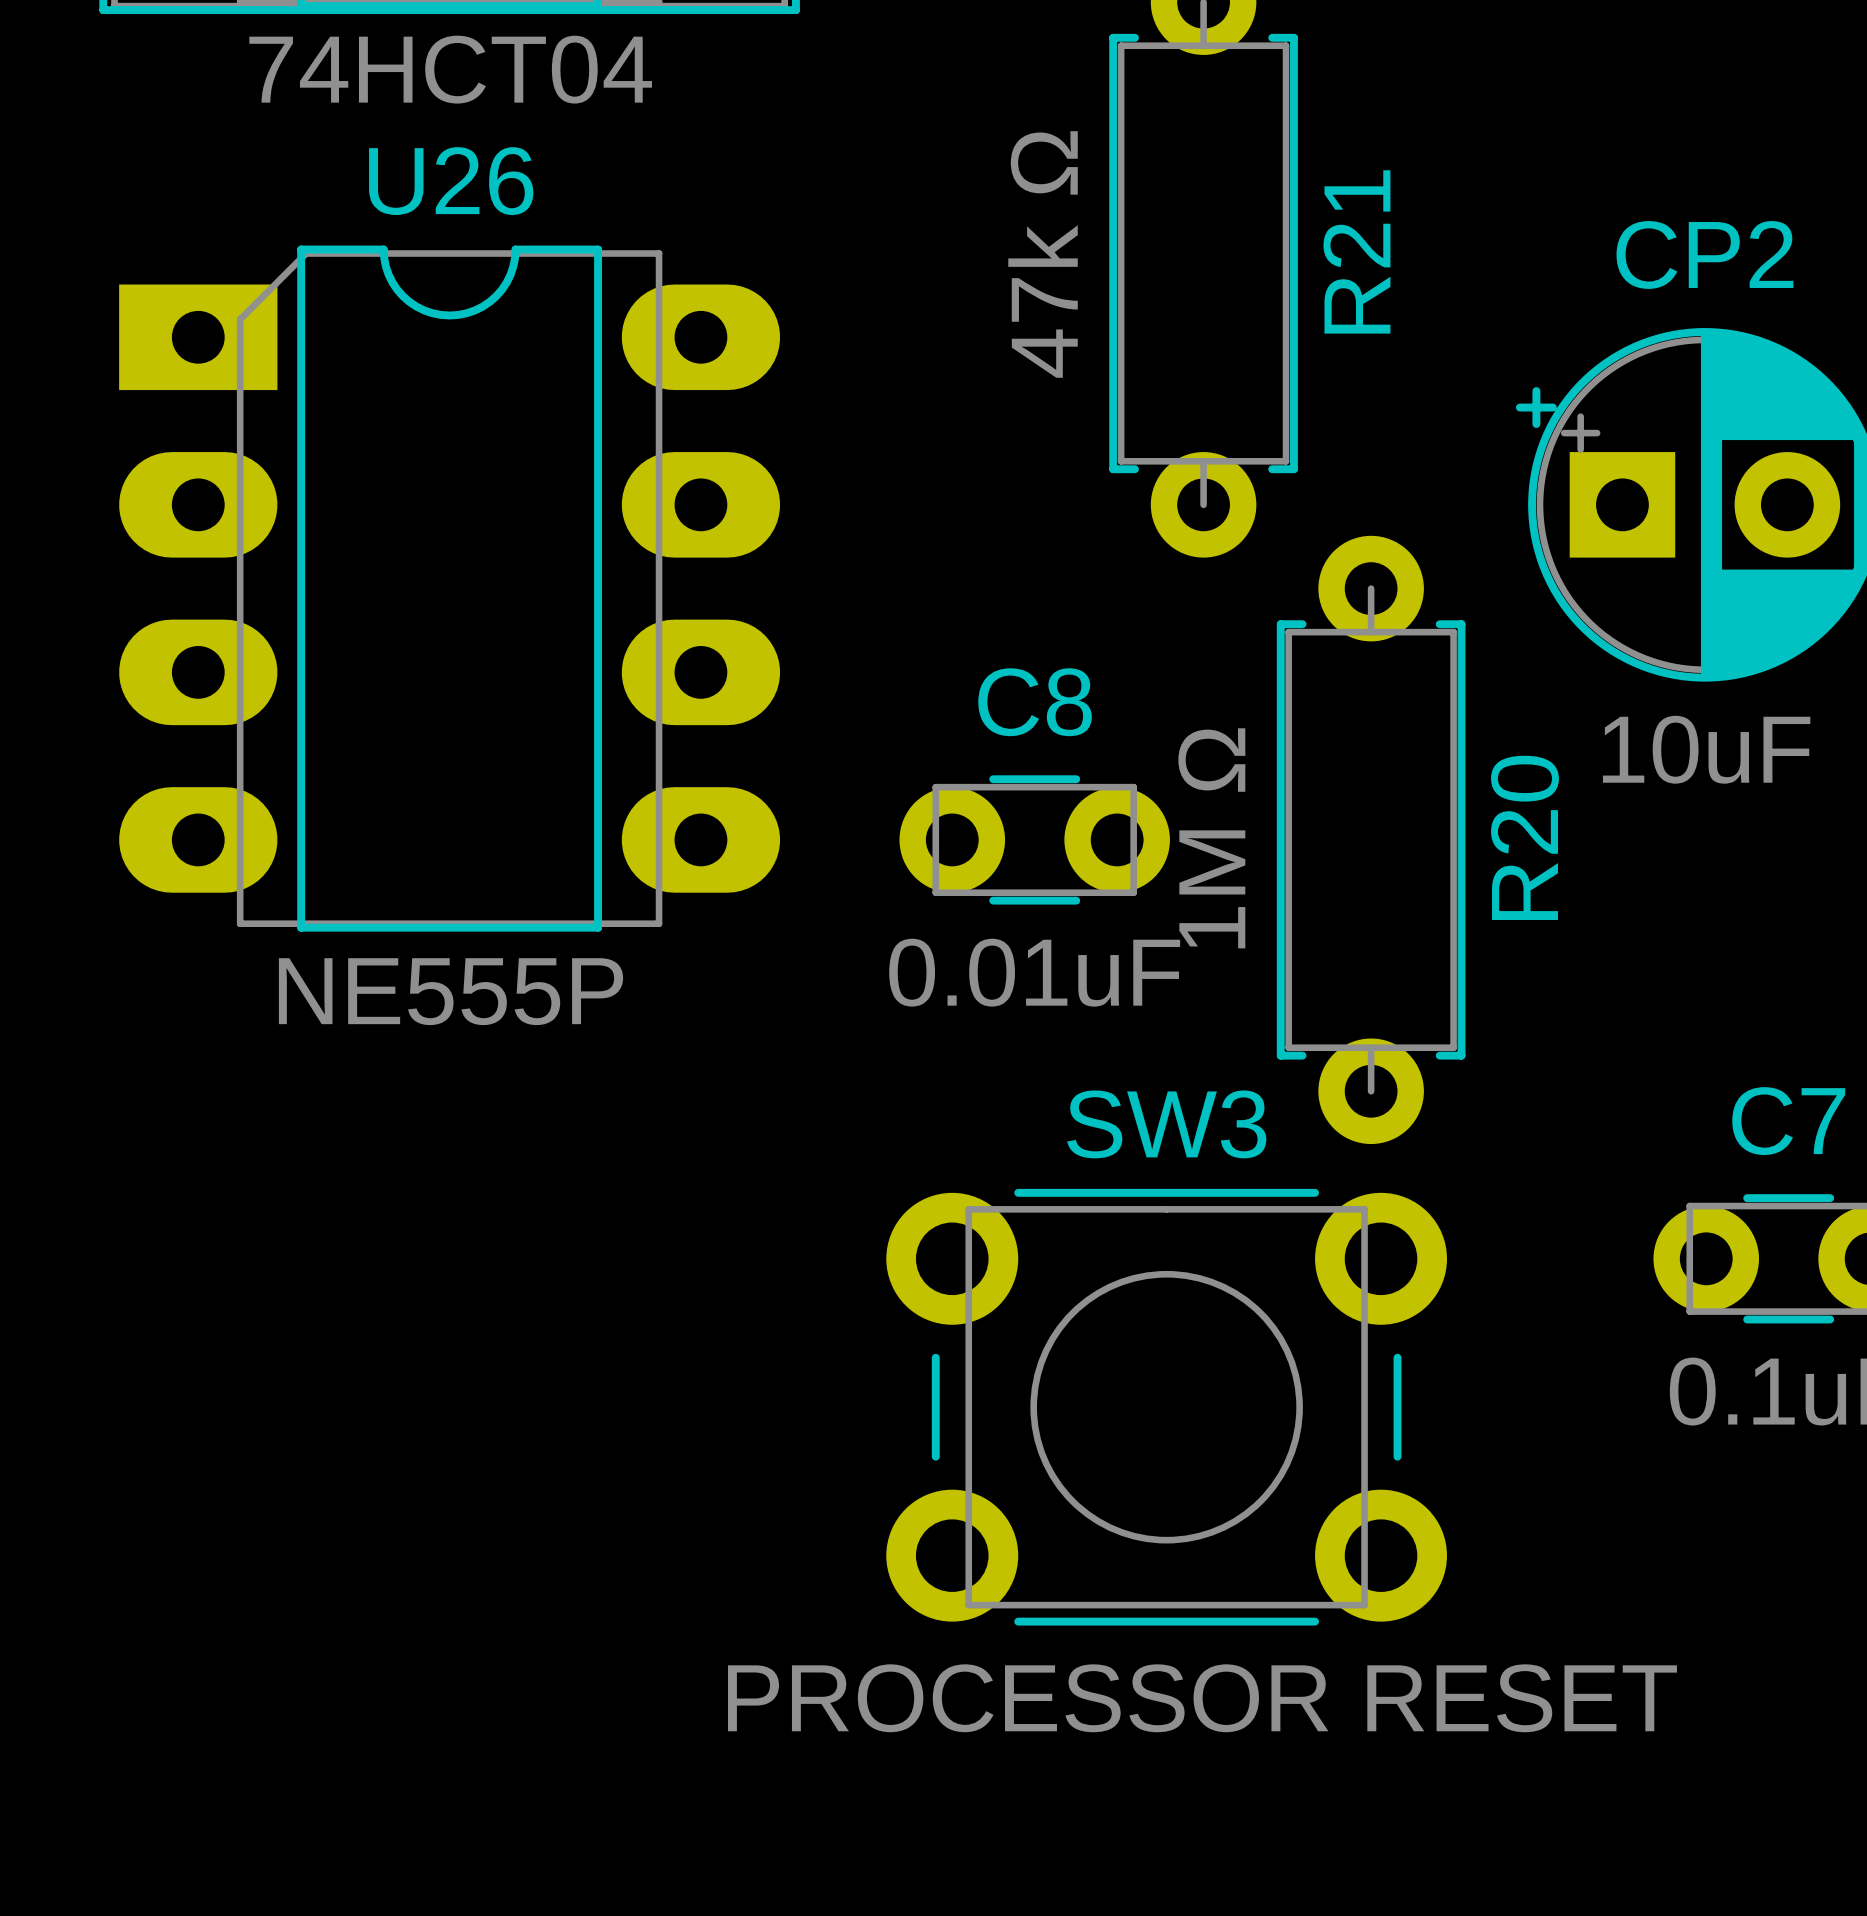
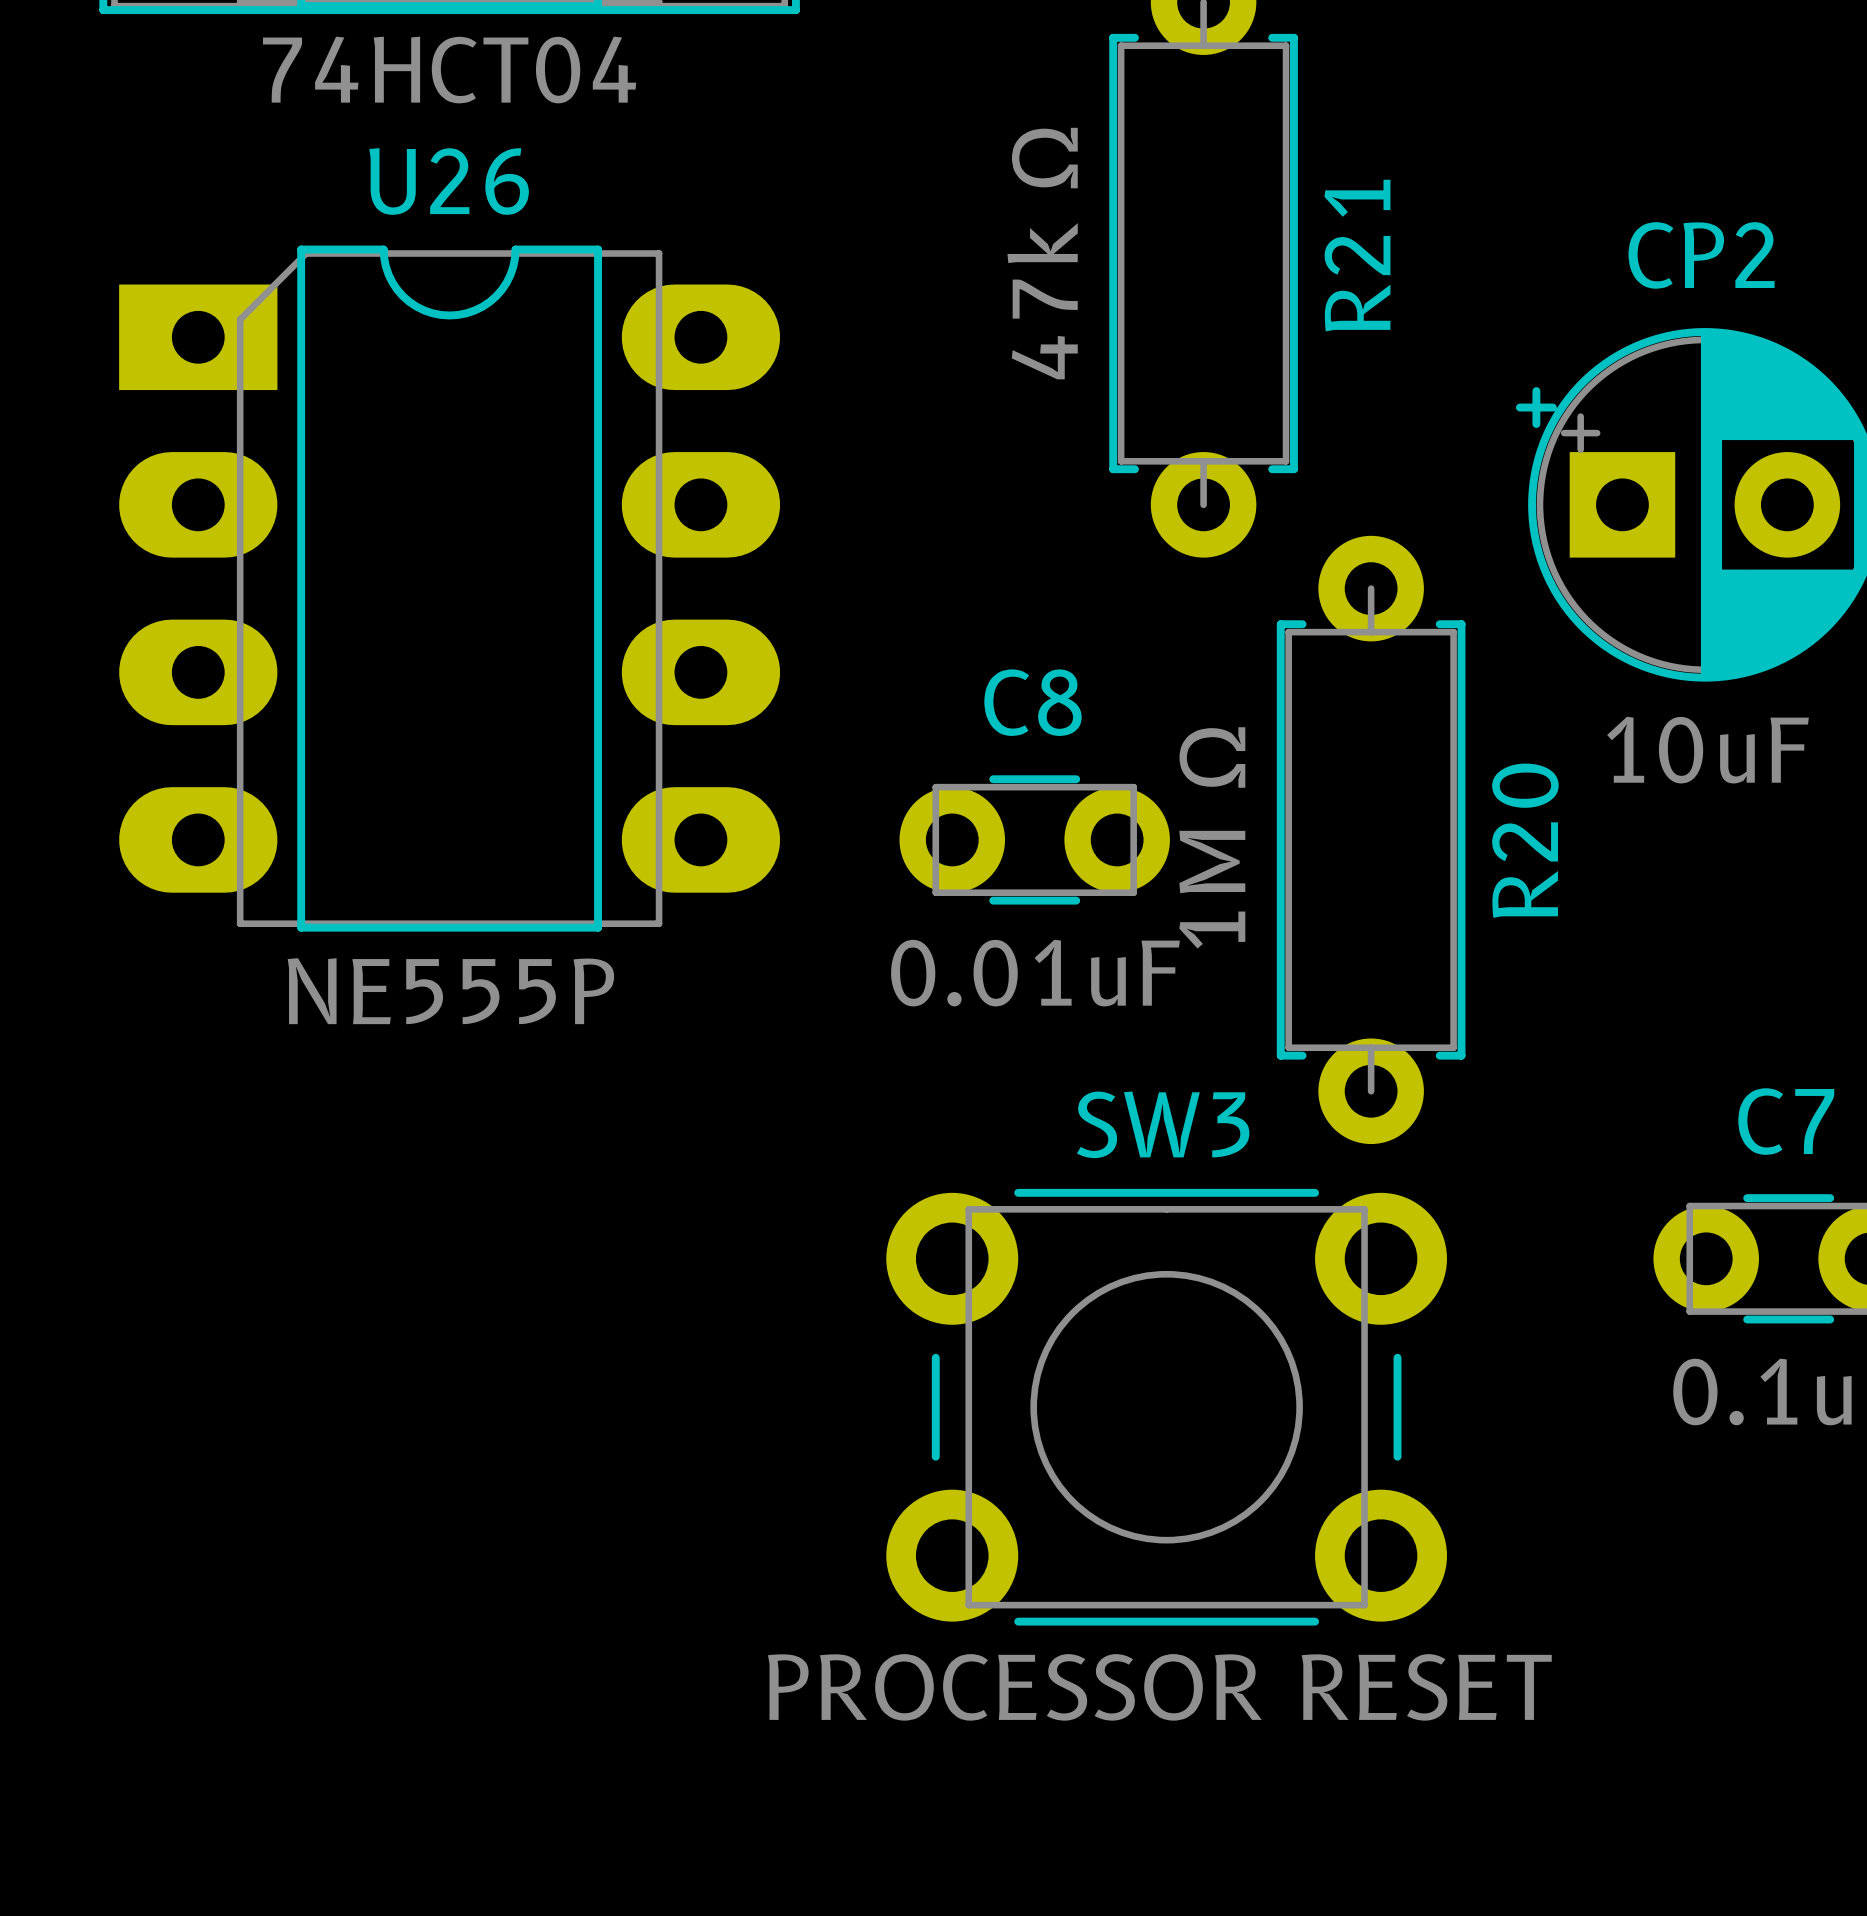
SW3 value position: PROCESSOR RESET (1202, 1698) -> PROCESSOR RESET (1159, 1687)

